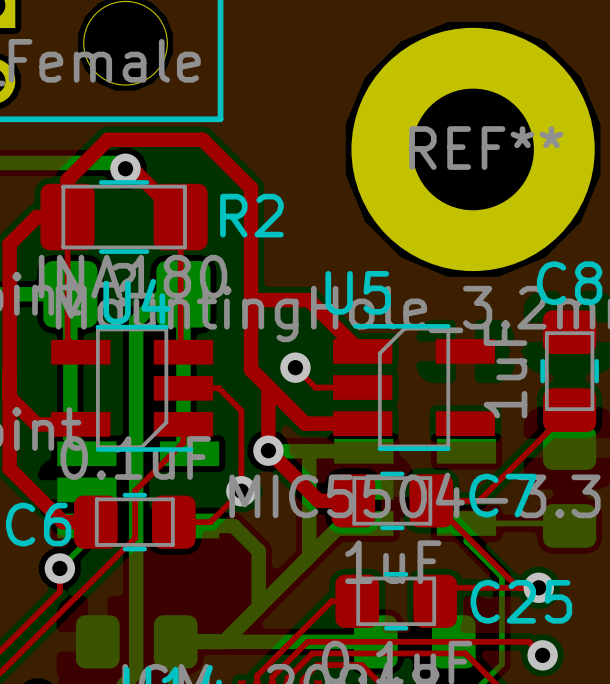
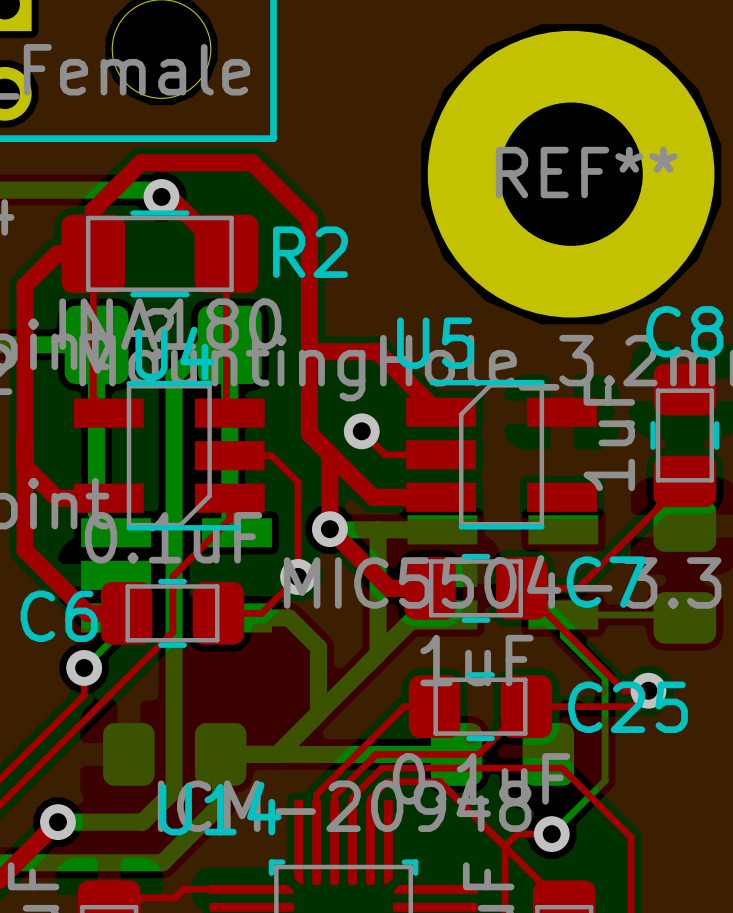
top track: (518, 587) (448, 587) (435, 601) -> none
top track: (394, 641) (529, 641) (542, 655) -> (478, 754) (526, 706) (632, 706) (648, 690)
via: (542, 655) -> none

